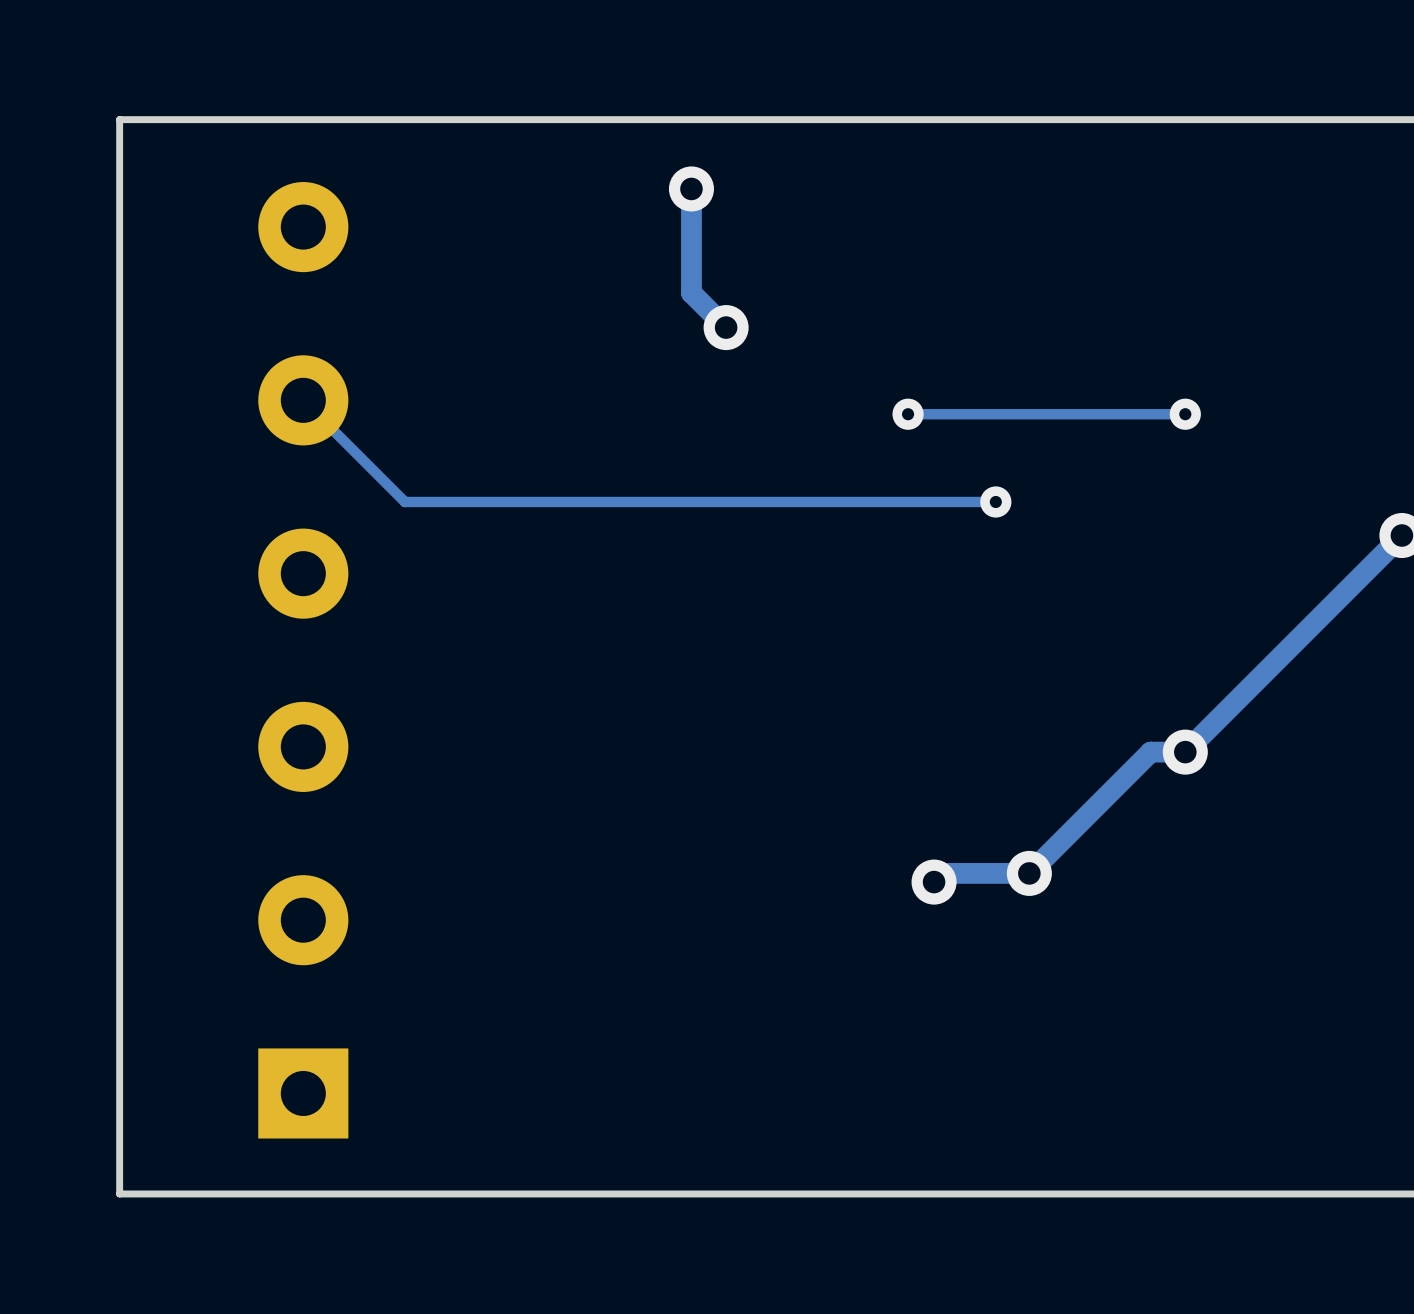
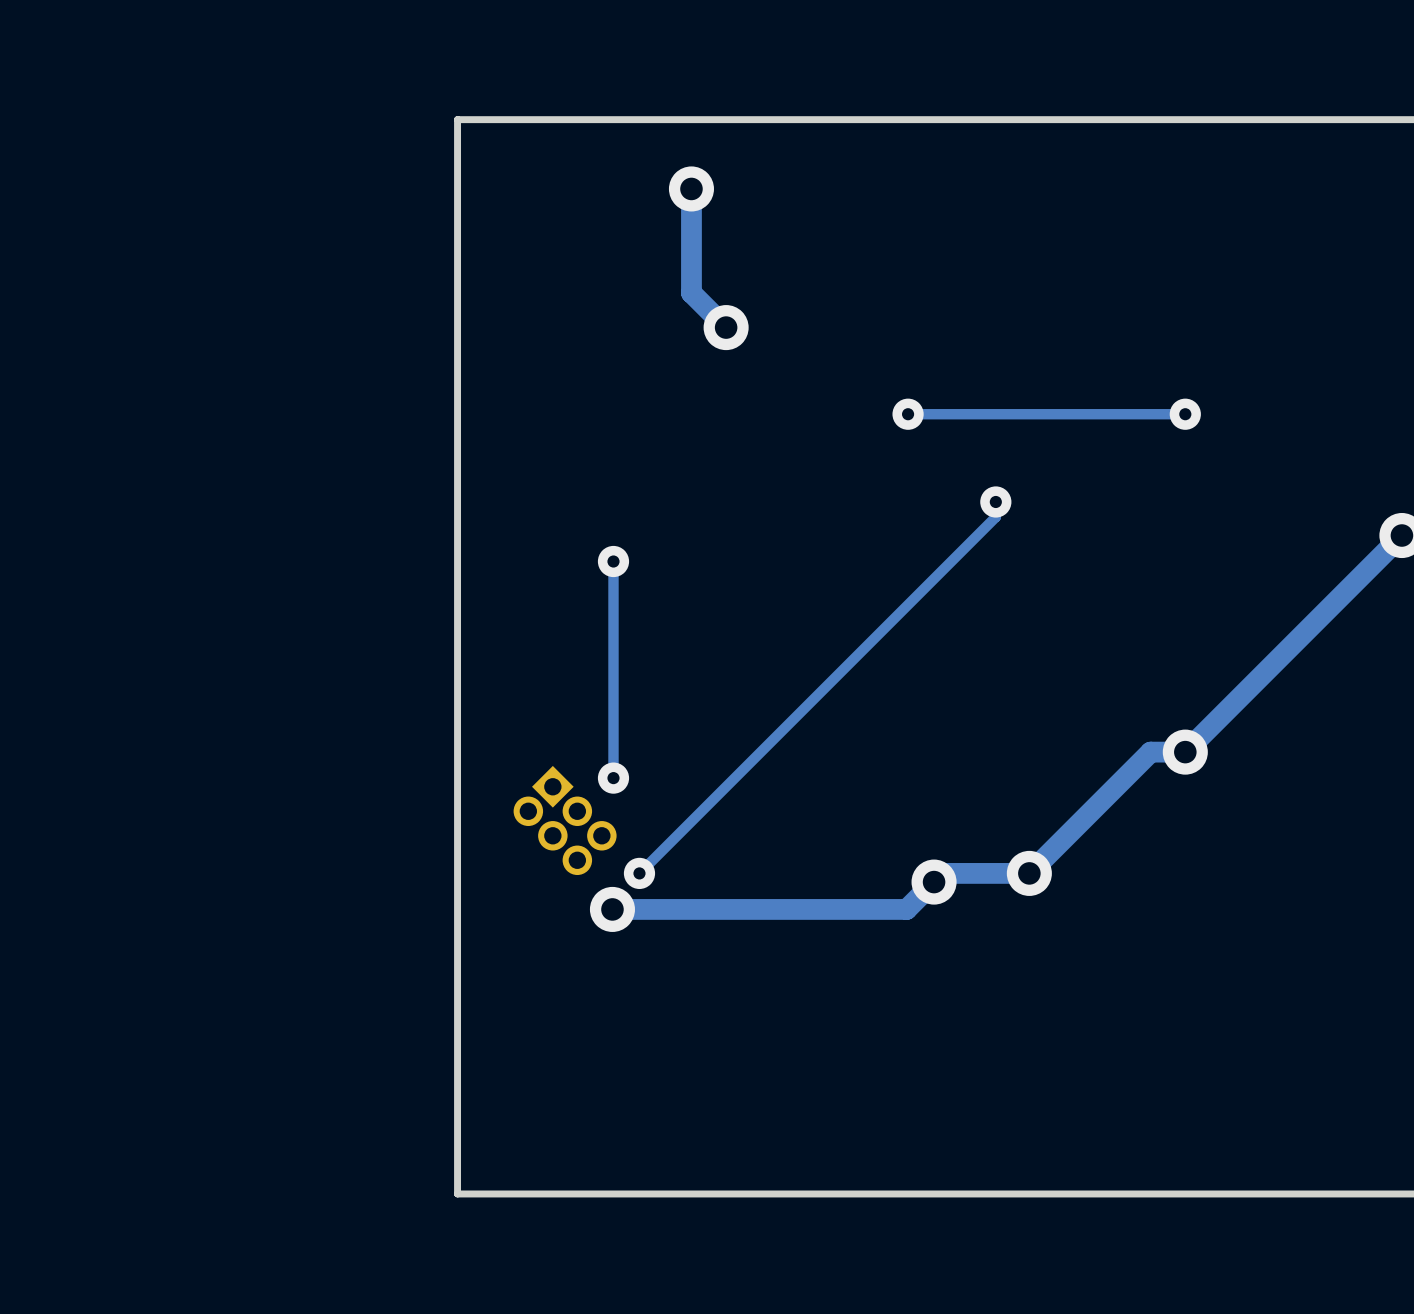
board edge: (457, 119) (119, 119) (119, 1193) (457, 1193) -> (457, 119) (457, 1193)
track: (303, 400) (404, 501) (995, 501) -> (639, 873) (995, 517) (995, 501)
track: none -> (613, 561) (613, 778)
via: none -> (613, 561)
part: (303, 660) -> none
via: none -> (613, 778)
part: none -> (565, 820)
via: none -> (639, 873)
track: none -> (934, 882) (906, 909) (612, 909)
via: none -> (612, 909)

